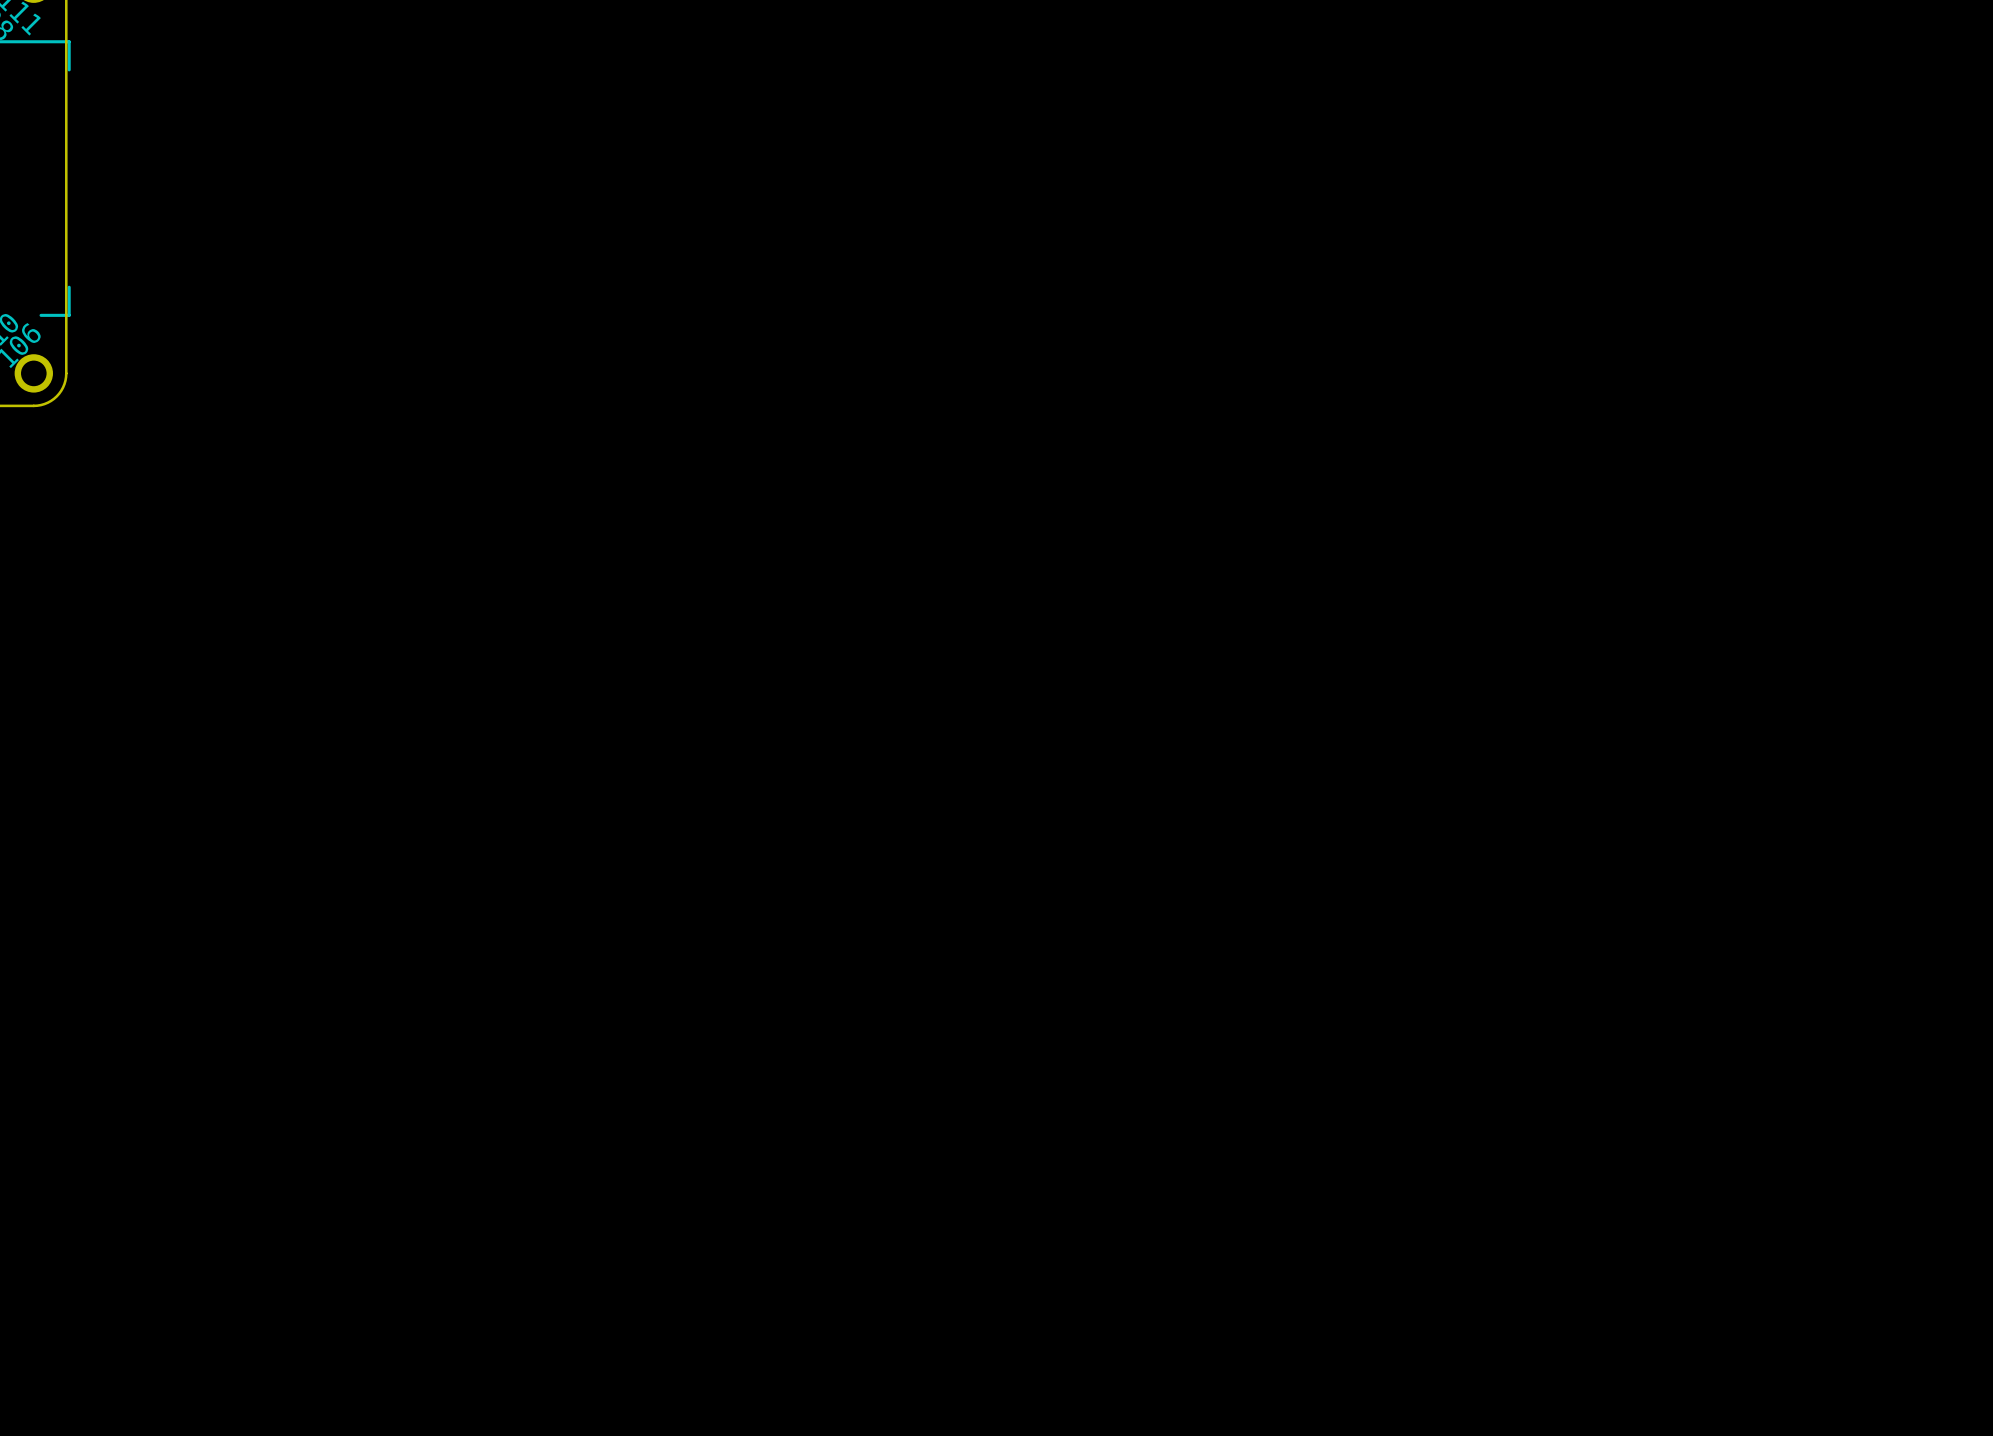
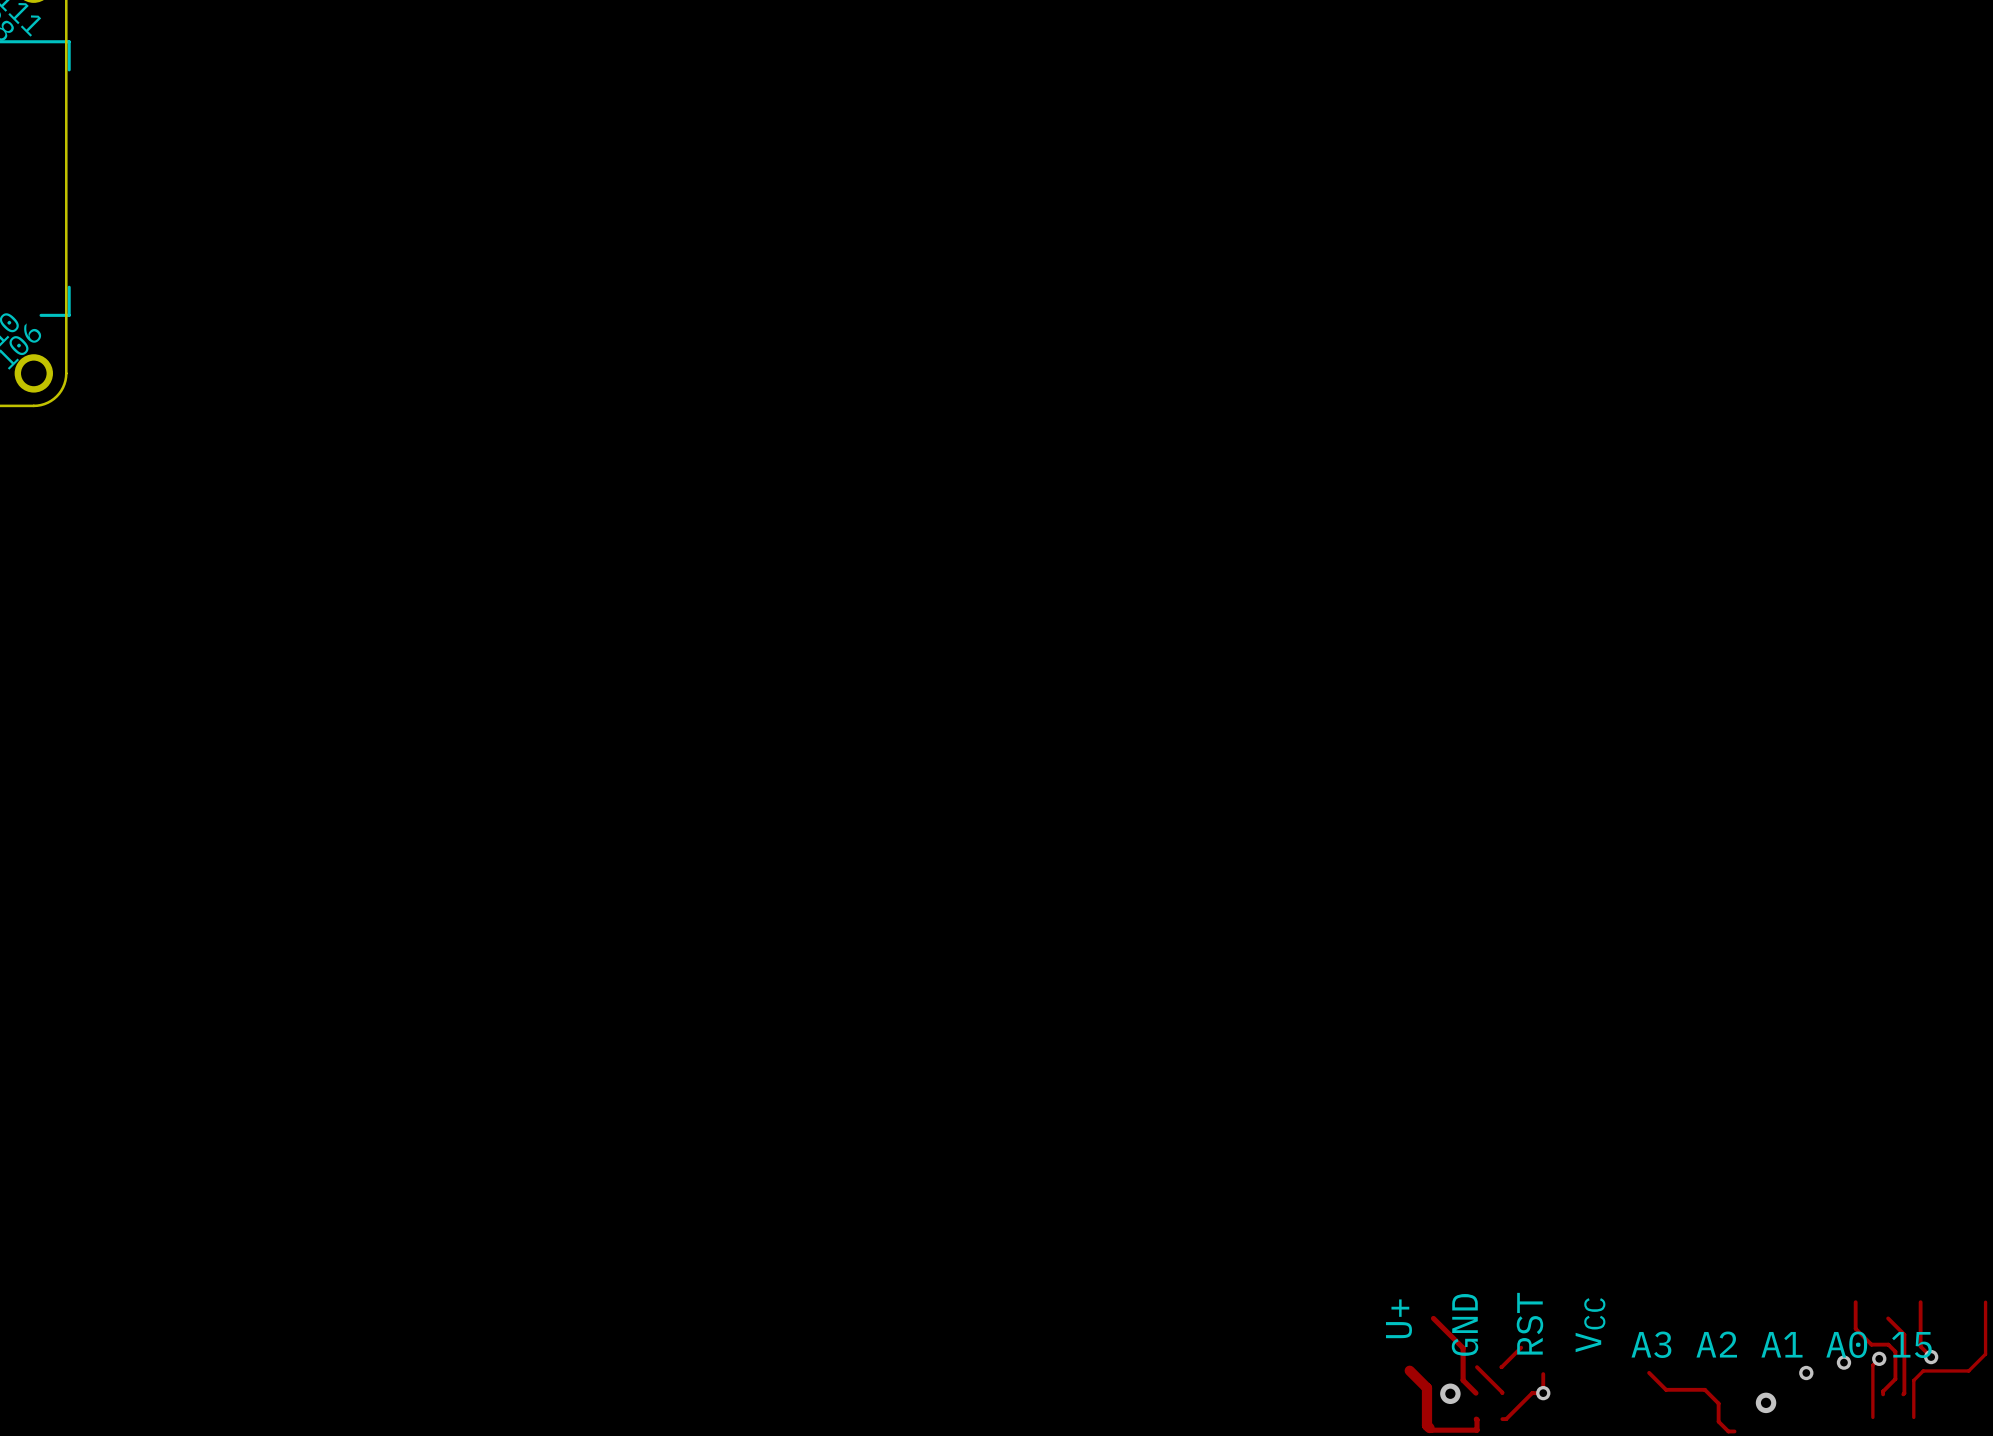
track: none -> (1855, 1302) (1855, 1328) (1871, 1344) (1888, 1344) (1895, 1351) (1895, 1379) (1883, 1391) (1883, 1394)
track: none -> (1920, 1302) (1920, 1346) (1931, 1357)
track: none -> (1985, 1302) (1985, 1354) (1968, 1370) (1923, 1370) (1913, 1380) (1913, 1417)
text: none -> U+ (1398, 1318)
track: none -> (1433, 1318) (1463, 1348) (1463, 1380) (1475, 1393)
track: none -> (1888, 1318) (1904, 1334) (1903, 1394)
text: none -> RST (1529, 1323)
text: none -> GND (1465, 1324)
text: none -> VCC (1590, 1325)
text: none -> A3 (1651, 1344)
text: none -> A2 (1716, 1344)
text: none -> A1 (1781, 1344)
text: none -> A0 (1846, 1344)
text: none -> 15 (1911, 1344)
track: none -> (1521, 1347) (1501, 1367)
via: none -> (1931, 1357)
track: none -> (1879, 1358) (1872, 1365) (1872, 1417)
via: none -> (1879, 1358)
via: none -> (1843, 1362)
track: none -> (1477, 1367) (1502, 1393)
track: none -> (1409, 1370) (1426, 1388) (1426, 1425) (1431, 1430) (1477, 1430) (1476, 1419)
track: none -> (1649, 1372) (1666, 1389) (1704, 1389) (1718, 1403) (1718, 1421) (1728, 1431) (1734, 1431)
via: none -> (1806, 1372)
track: none -> (1543, 1374) (1543, 1393) (1532, 1393) (1506, 1419) (1502, 1419)
via: none -> (1450, 1393)
via: none -> (1543, 1393)
via: none -> (1766, 1402)

